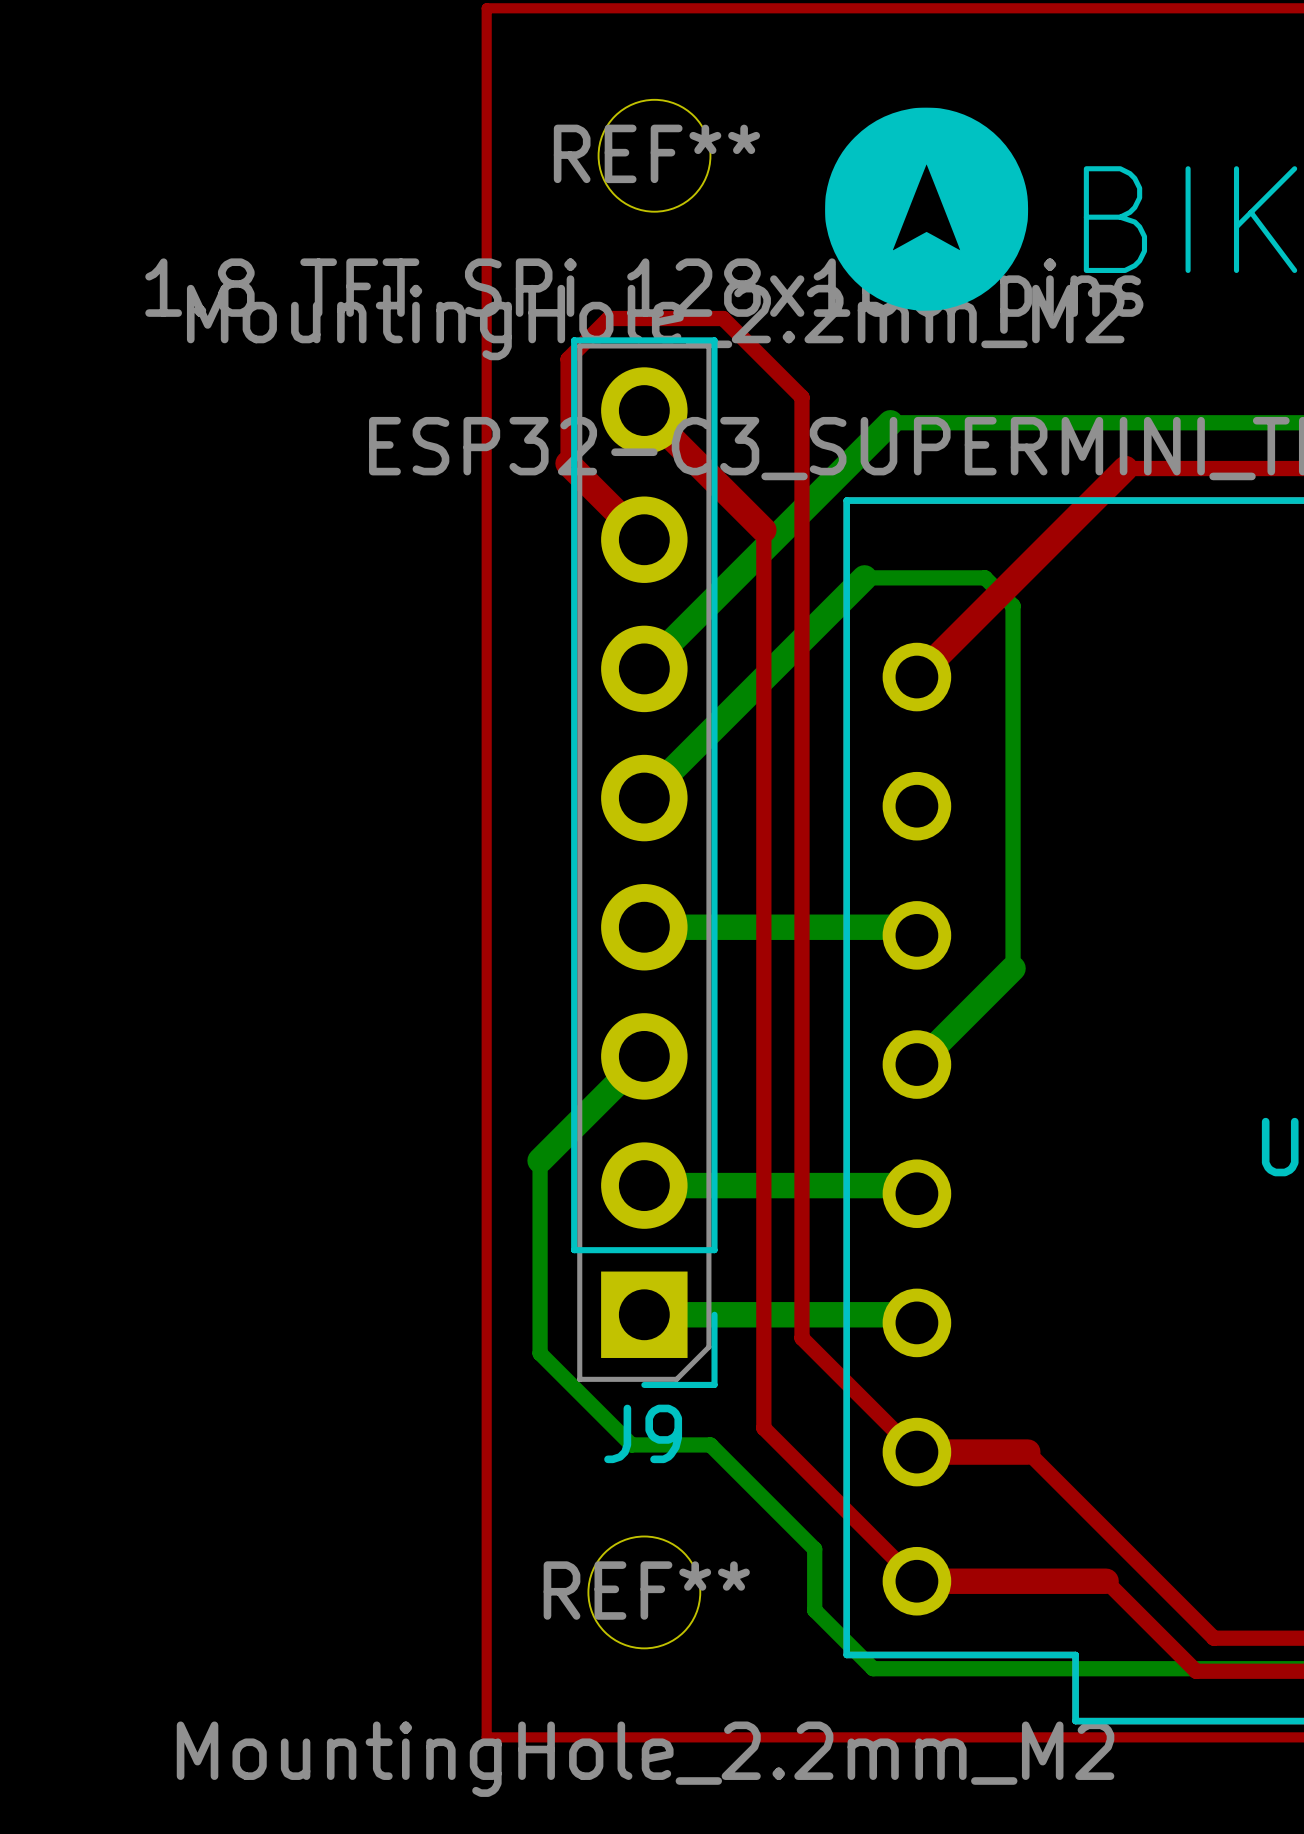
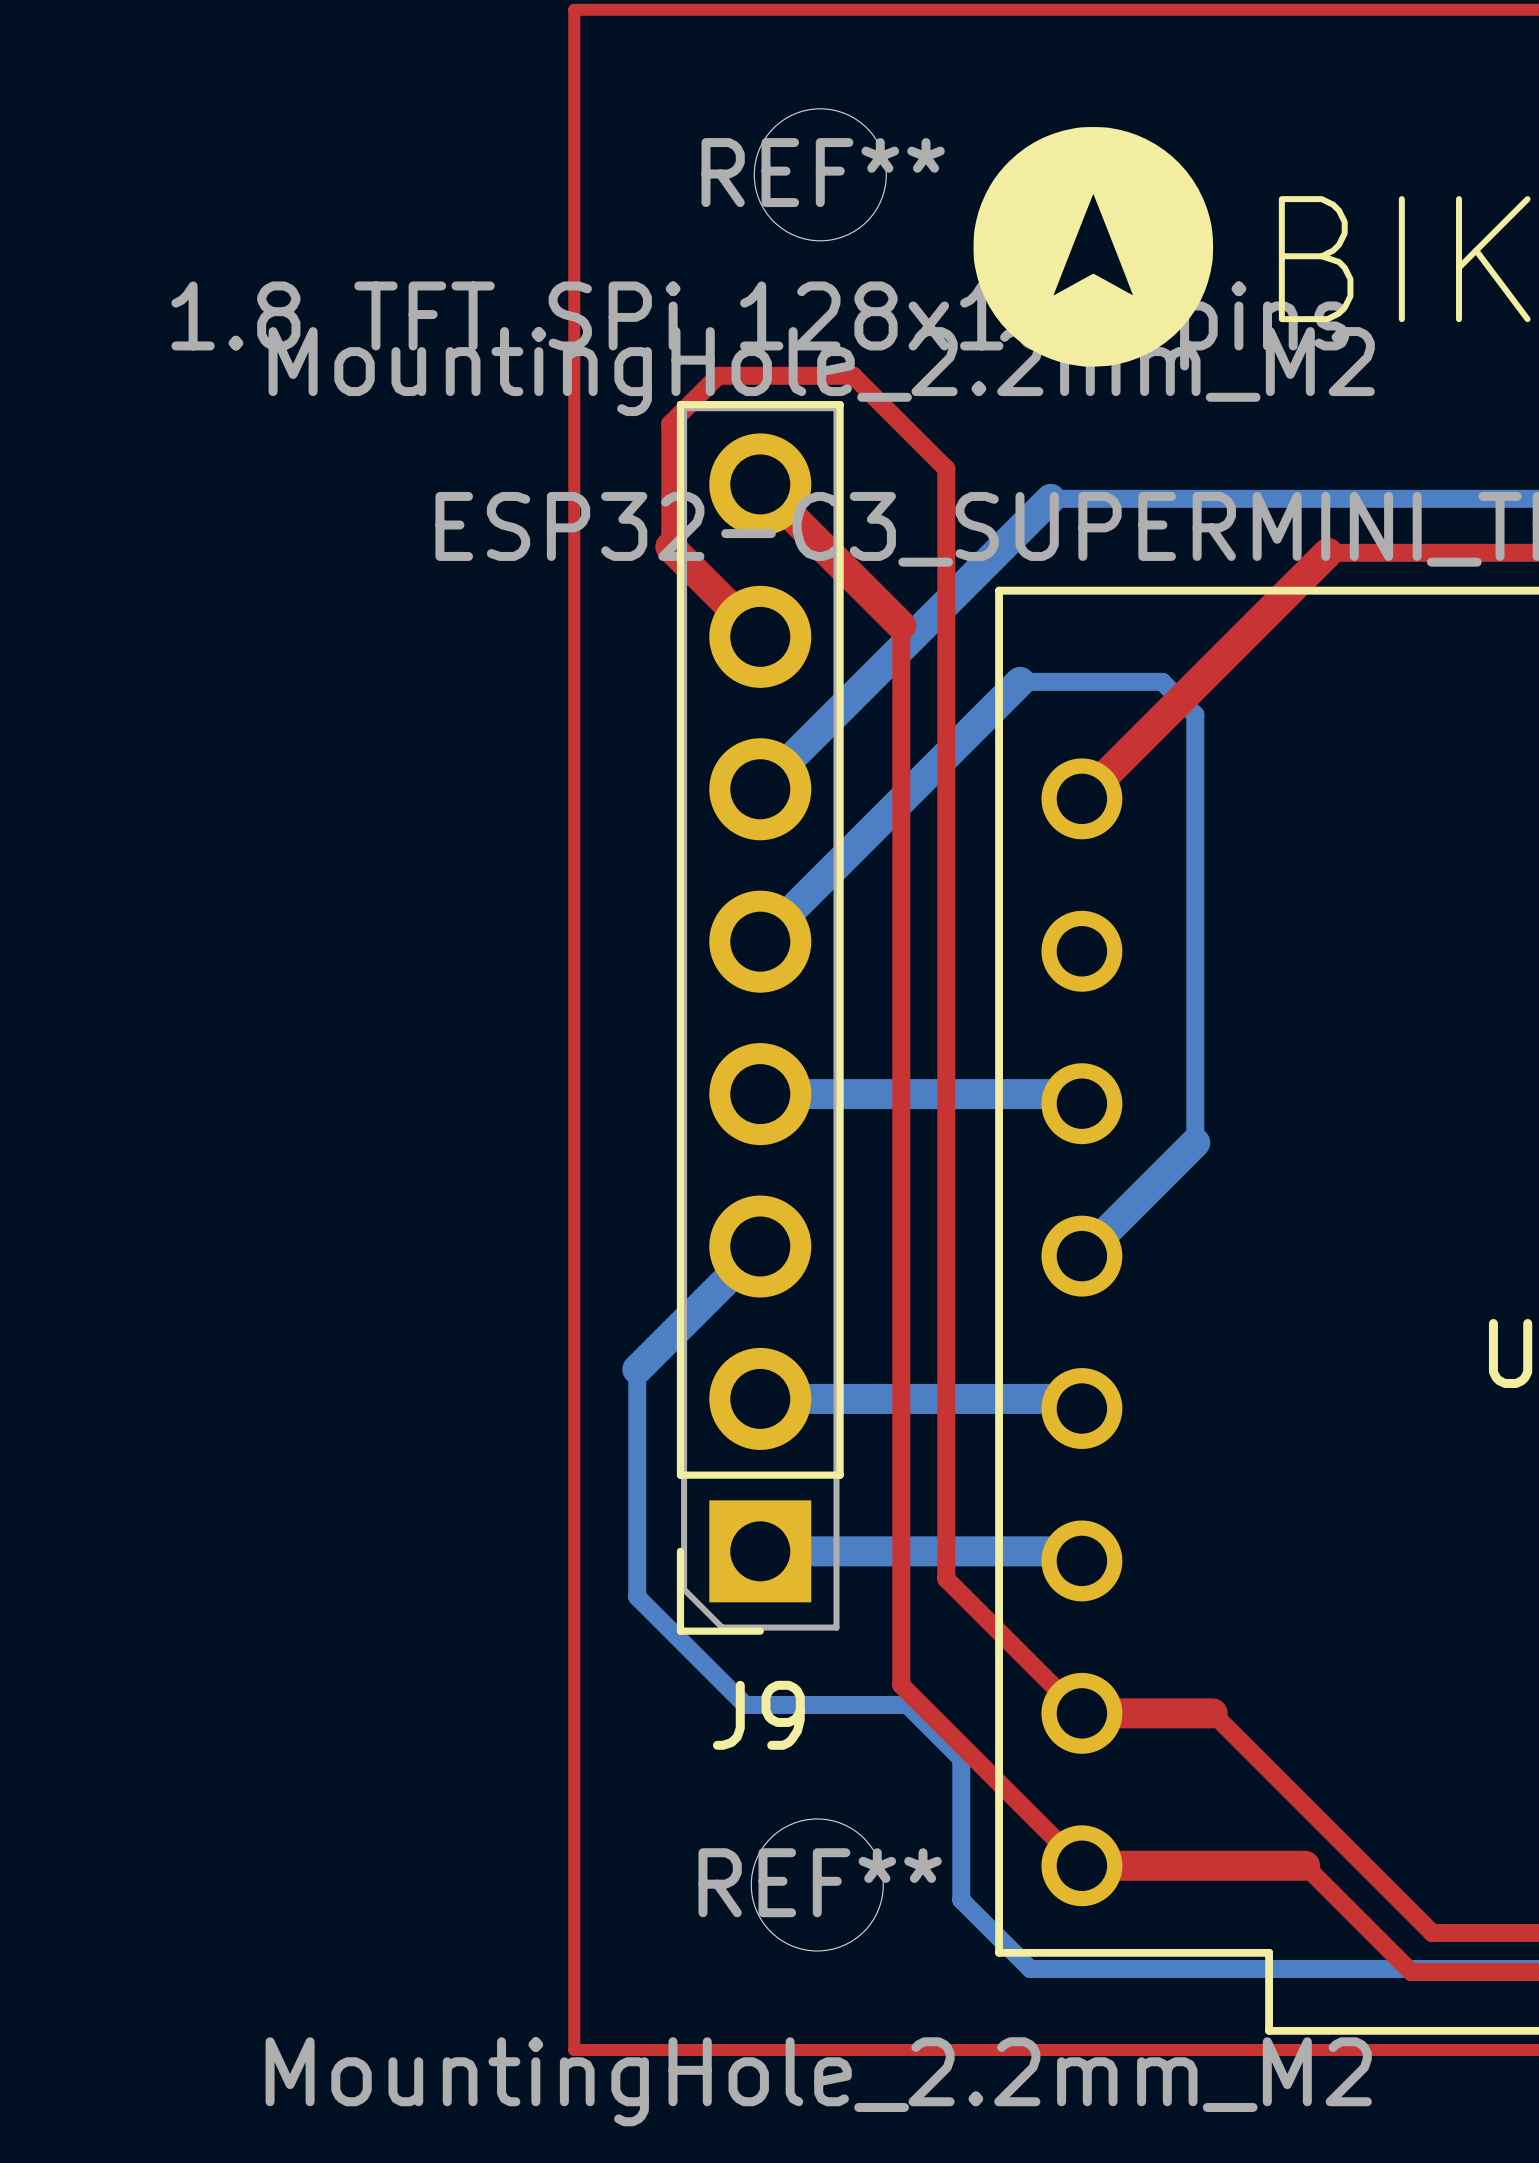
REF** position: (654, 155) -> (820, 174)
J9 footprint: [571, 337, 718, 1388] -> [676, 401, 844, 1635]
bottom track: (710, 1444) (814, 1549) -> (838, 1704) (907, 1704) (961, 1758) (961, 1827)
REF** position: (644, 1592) -> (817, 1884)

